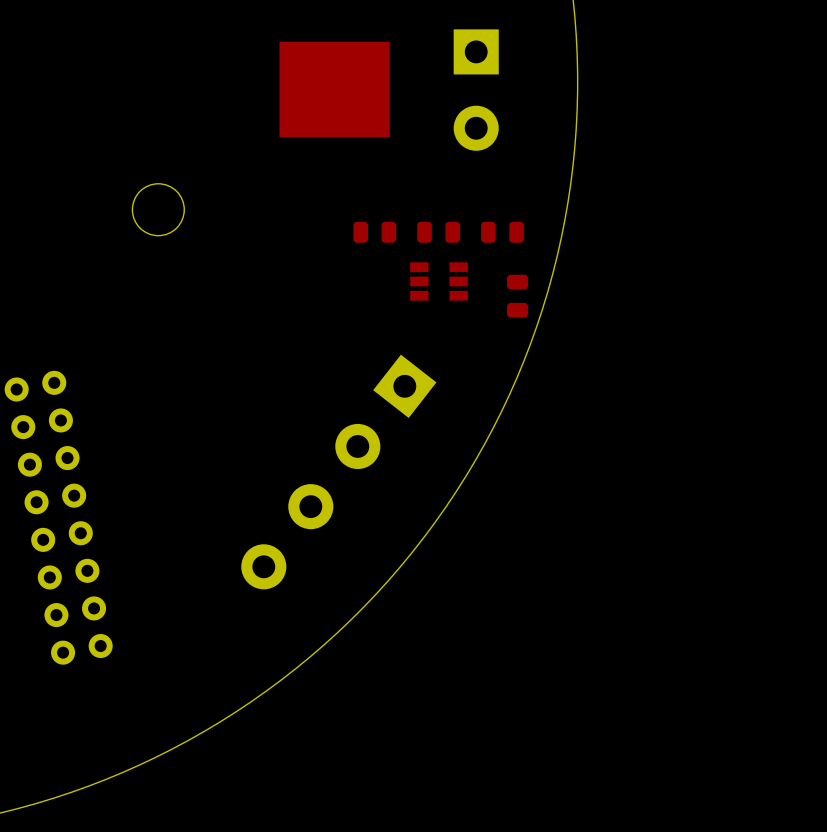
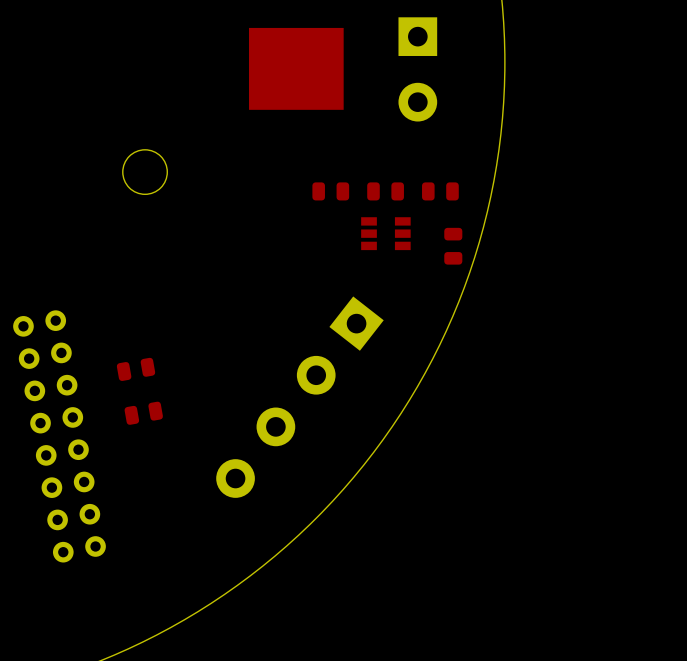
part: none -> (136, 369)
part: none -> (143, 413)

